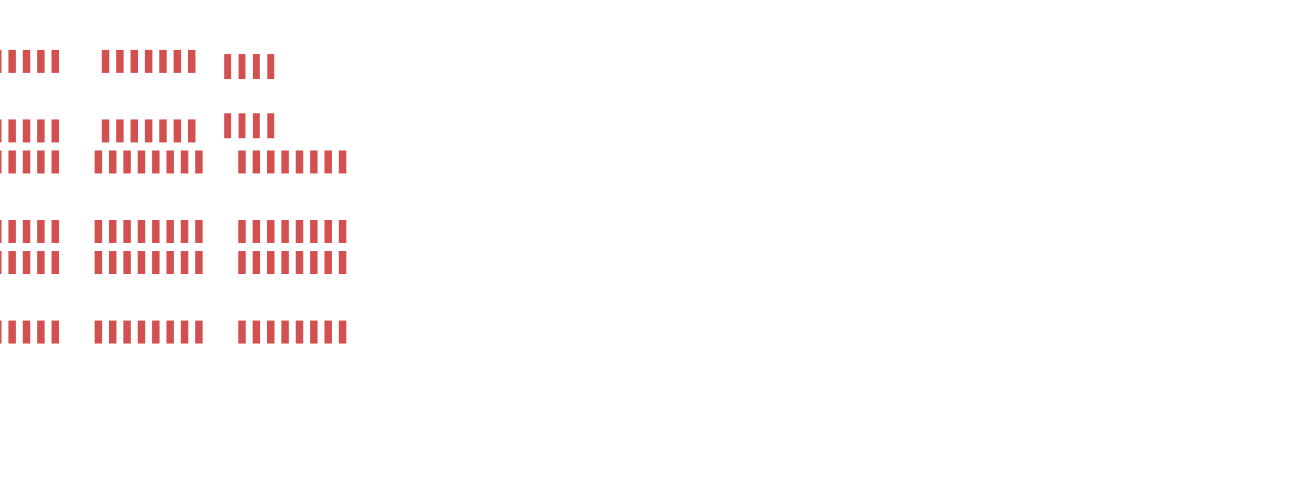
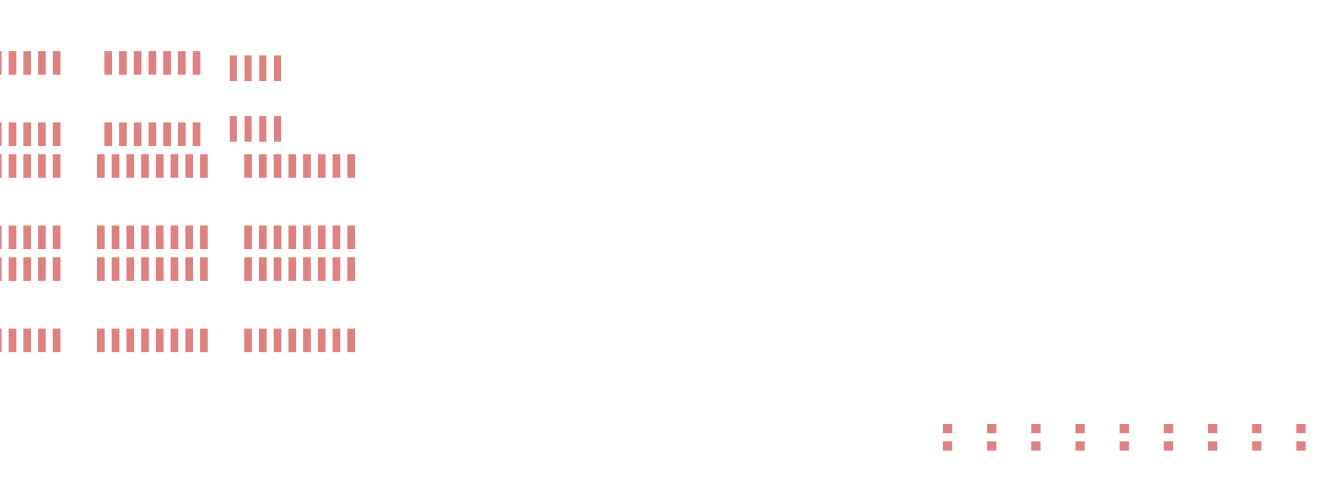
part: none -> (947, 437)
part: none -> (991, 437)
part: none -> (1035, 437)
part: none -> (1080, 437)
part: none -> (1124, 437)
part: none -> (1168, 437)
part: none -> (1212, 437)
part: none -> (1256, 437)
part: none -> (1300, 437)

